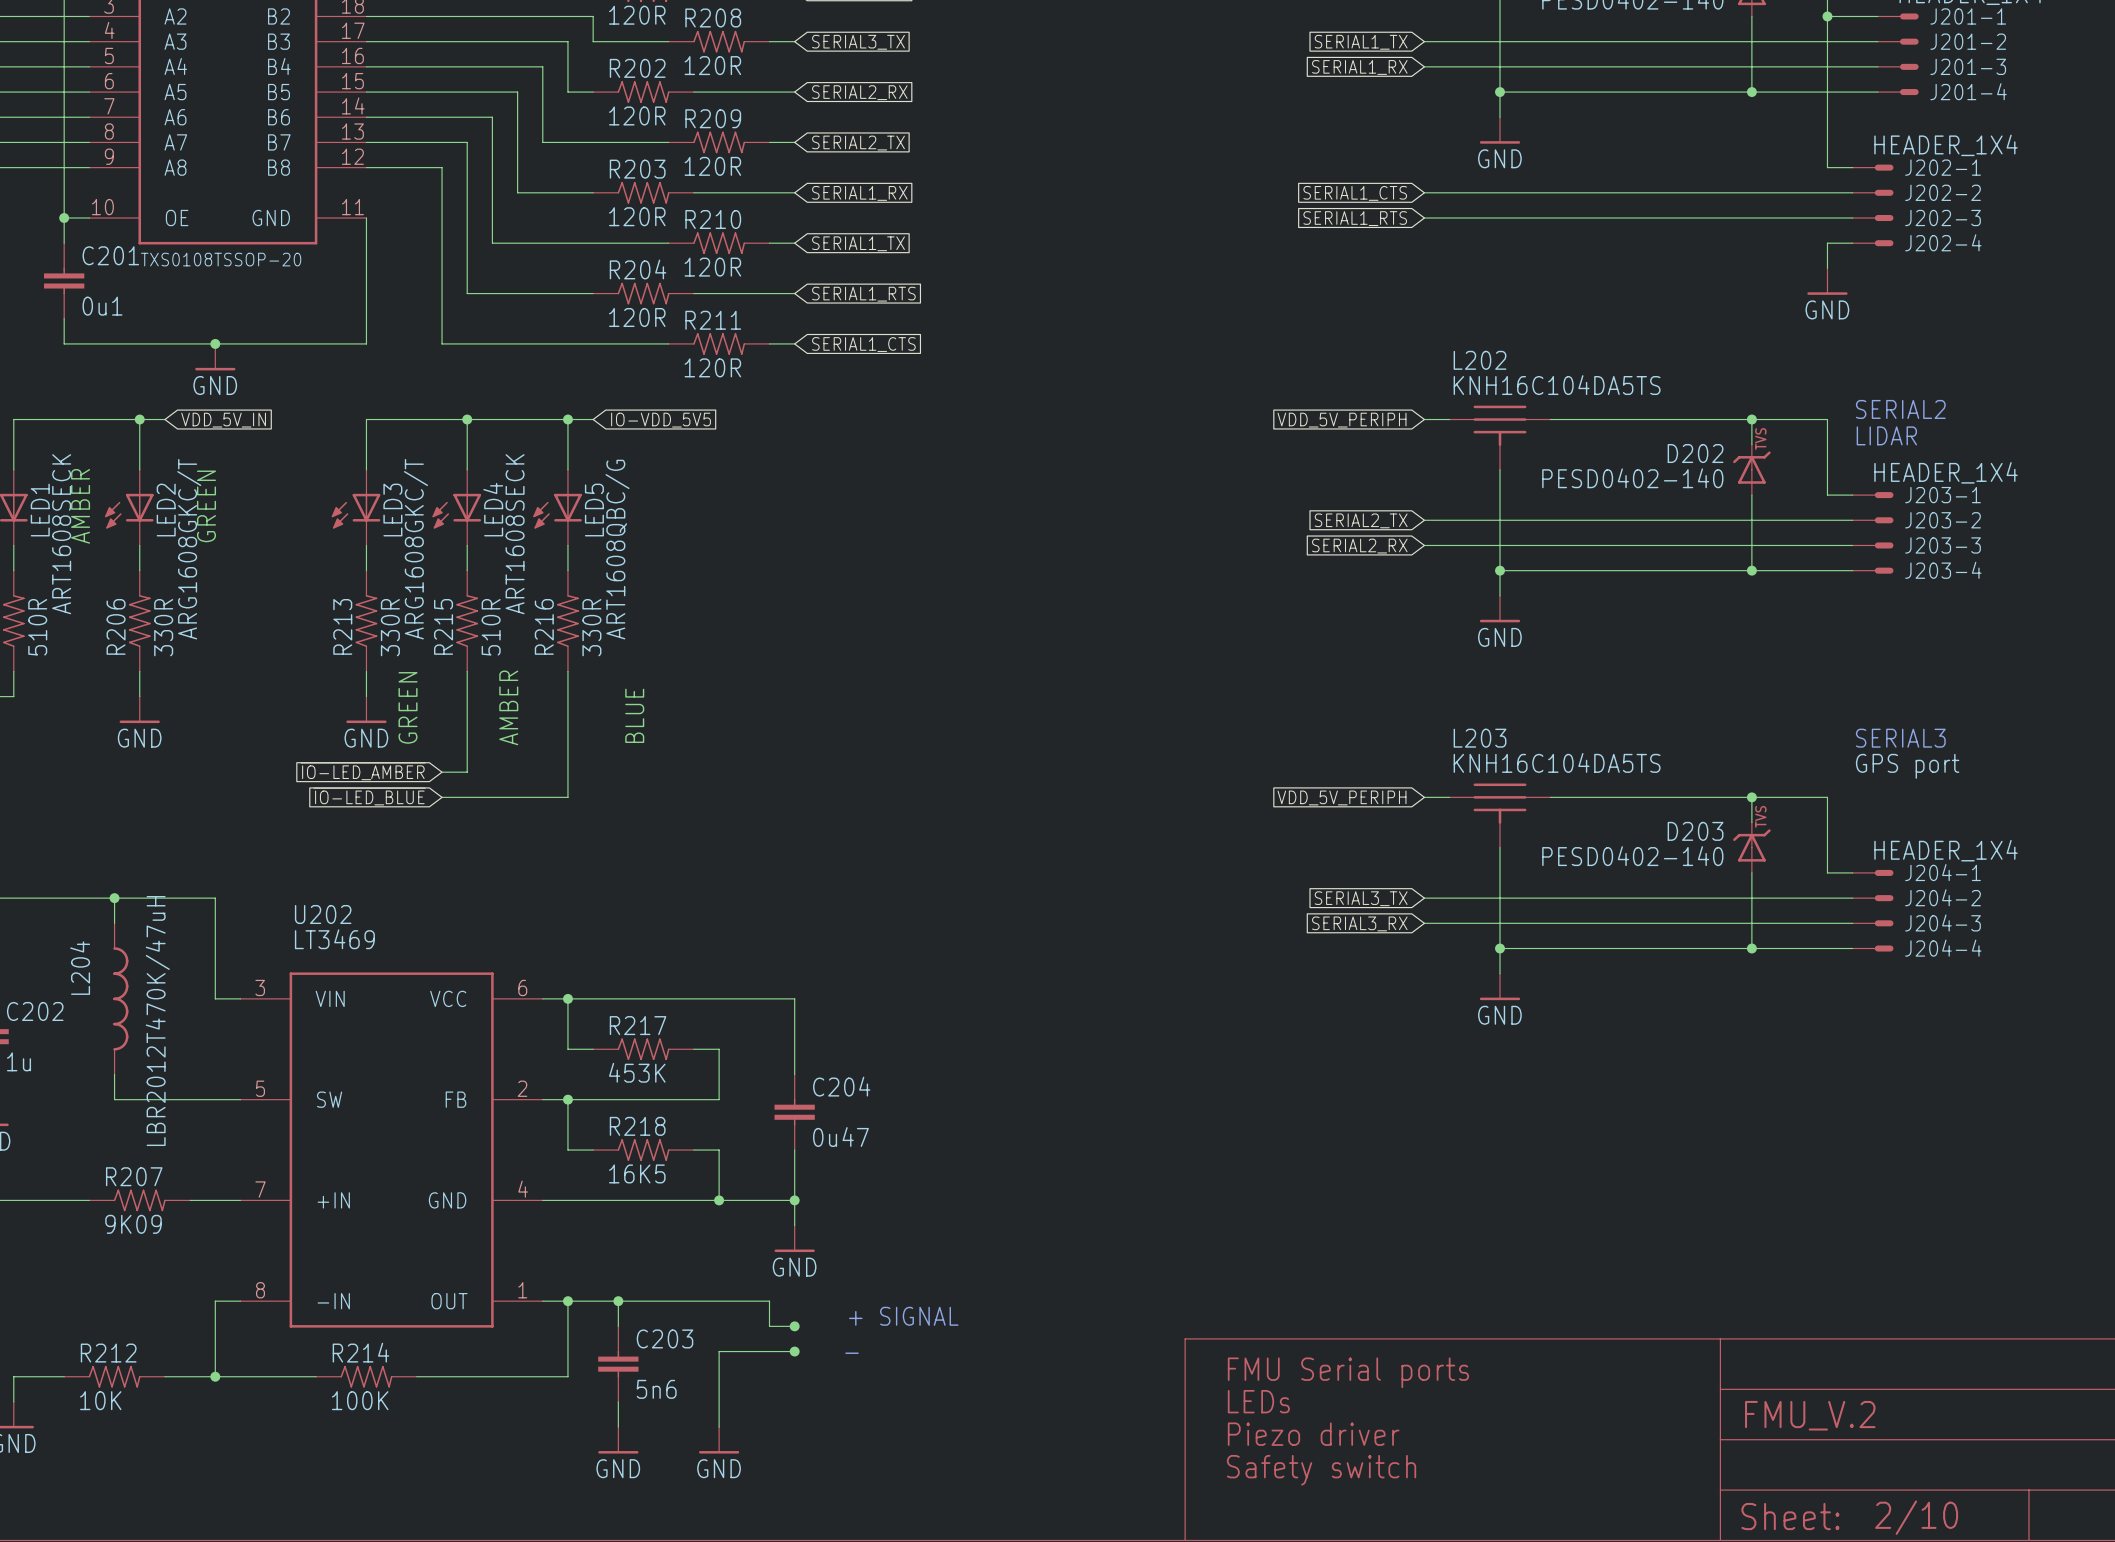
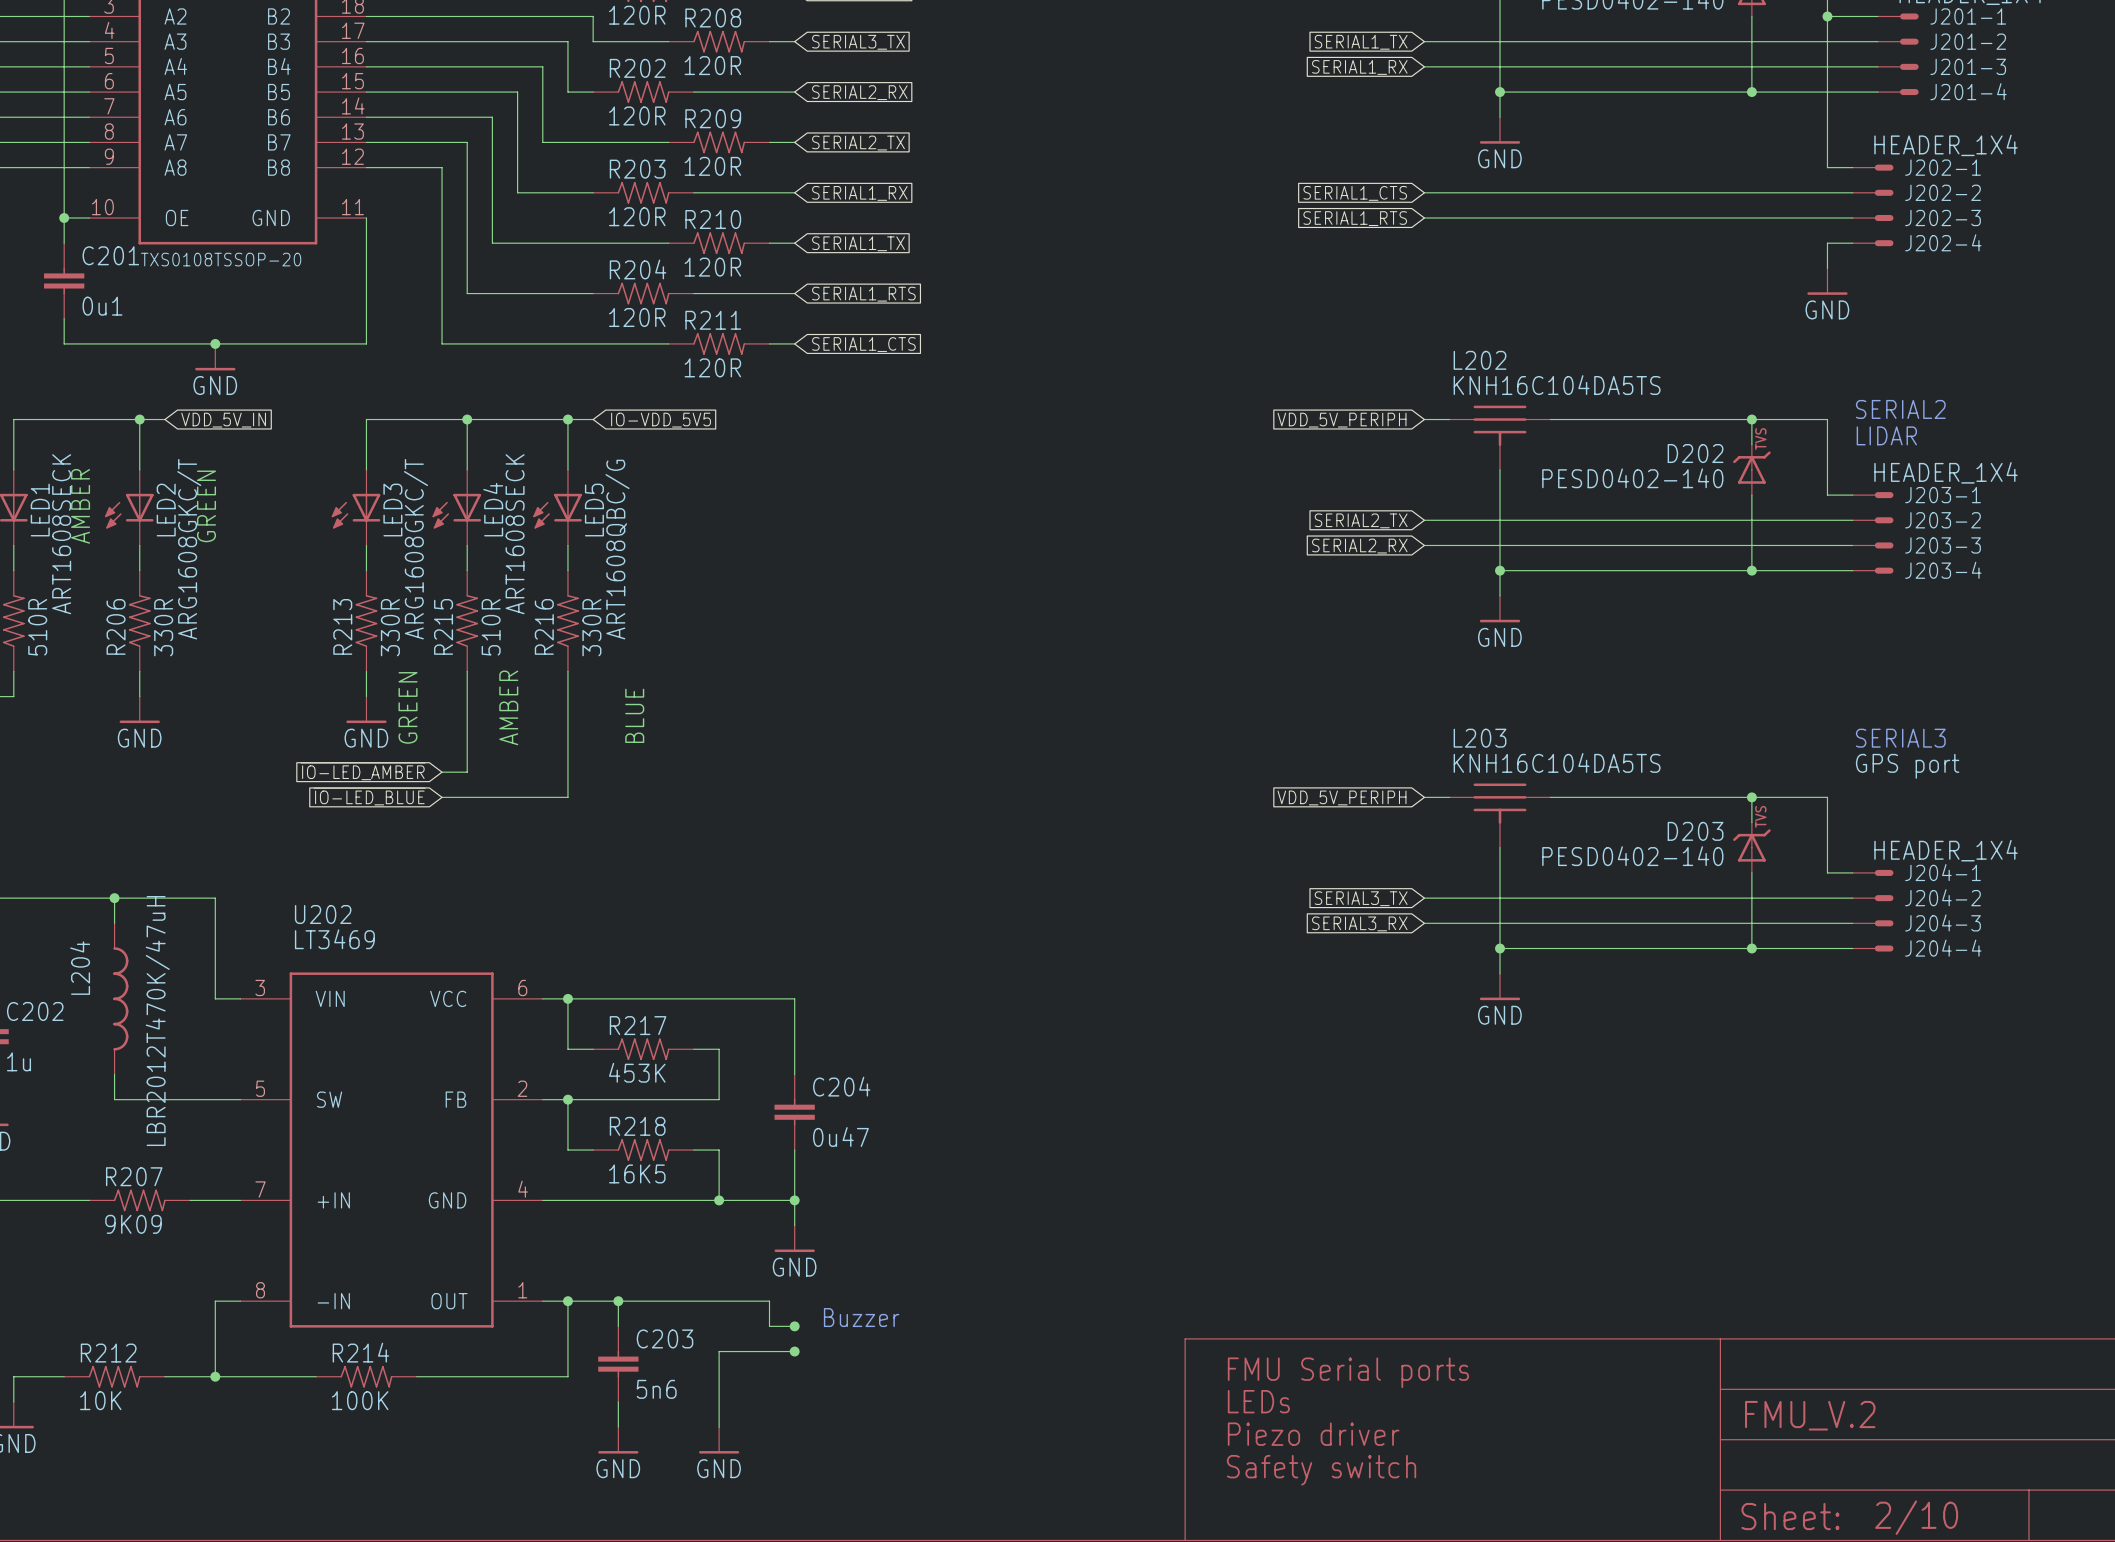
text: + SIGNAL (903, 1316) -> none
text: none -> Buzzer (861, 1317)
text: _ (852, 1353) -> none

